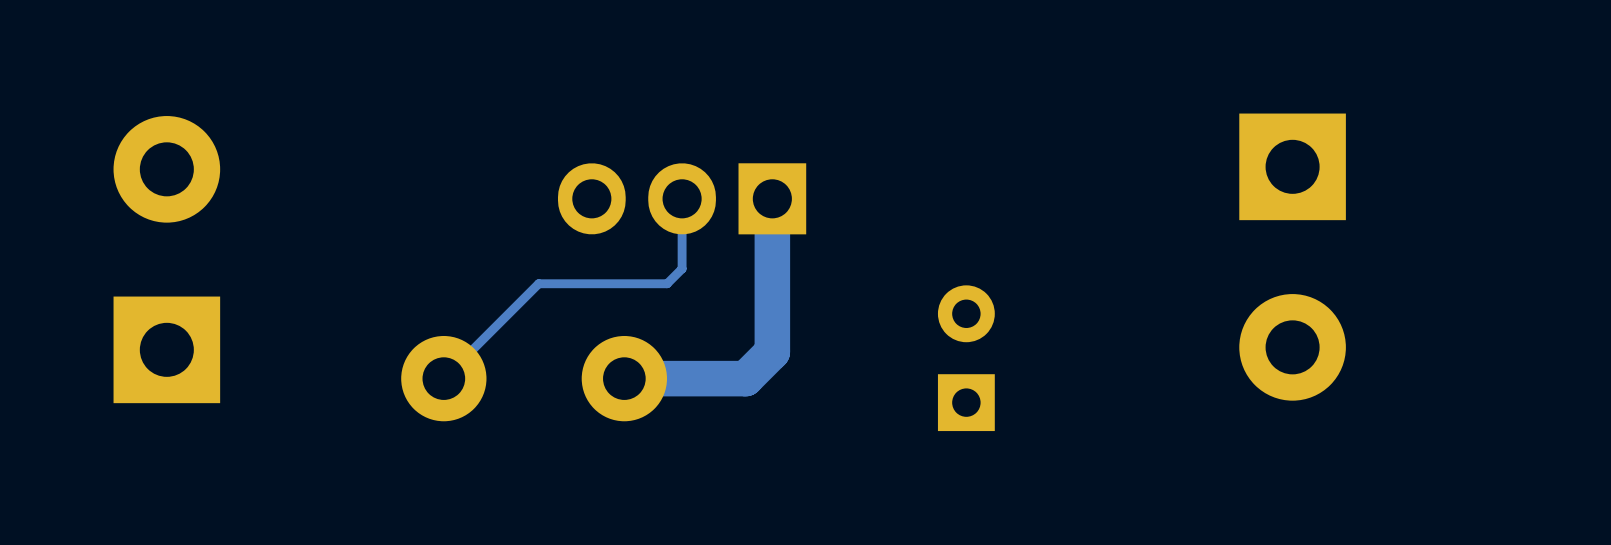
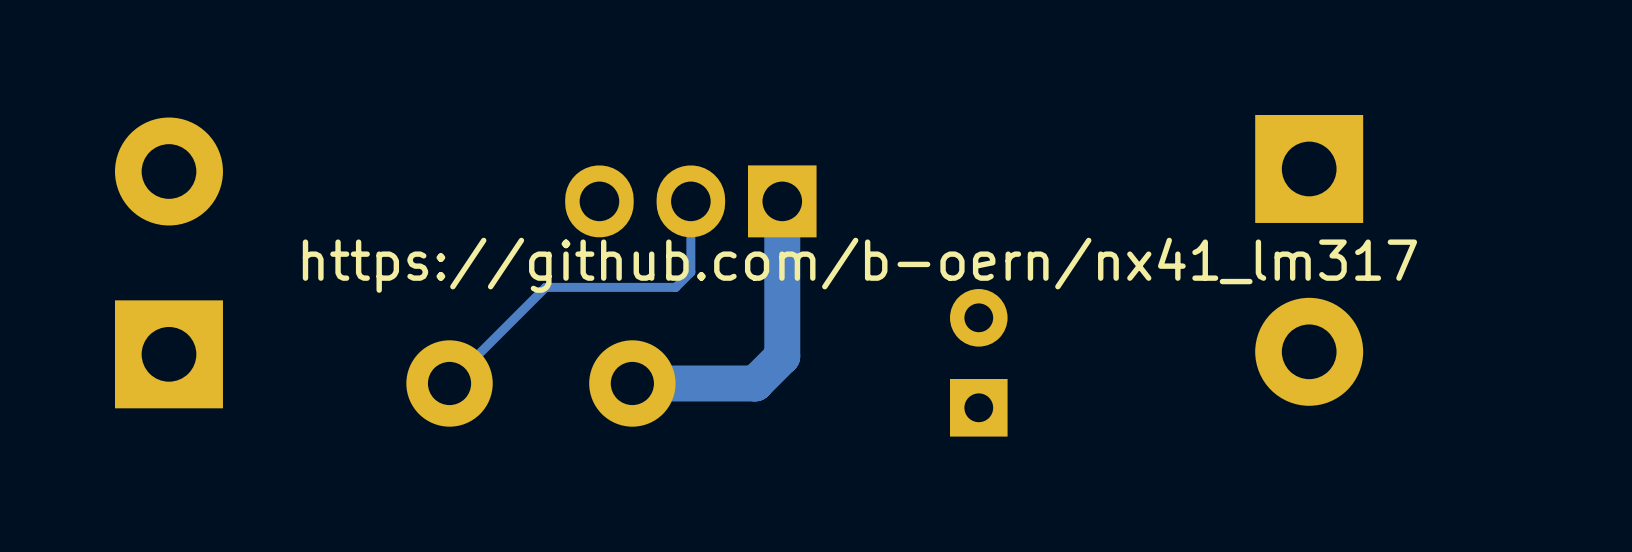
text: none -> https://github.com/b-oern/nx41_lm317 (859, 265)

